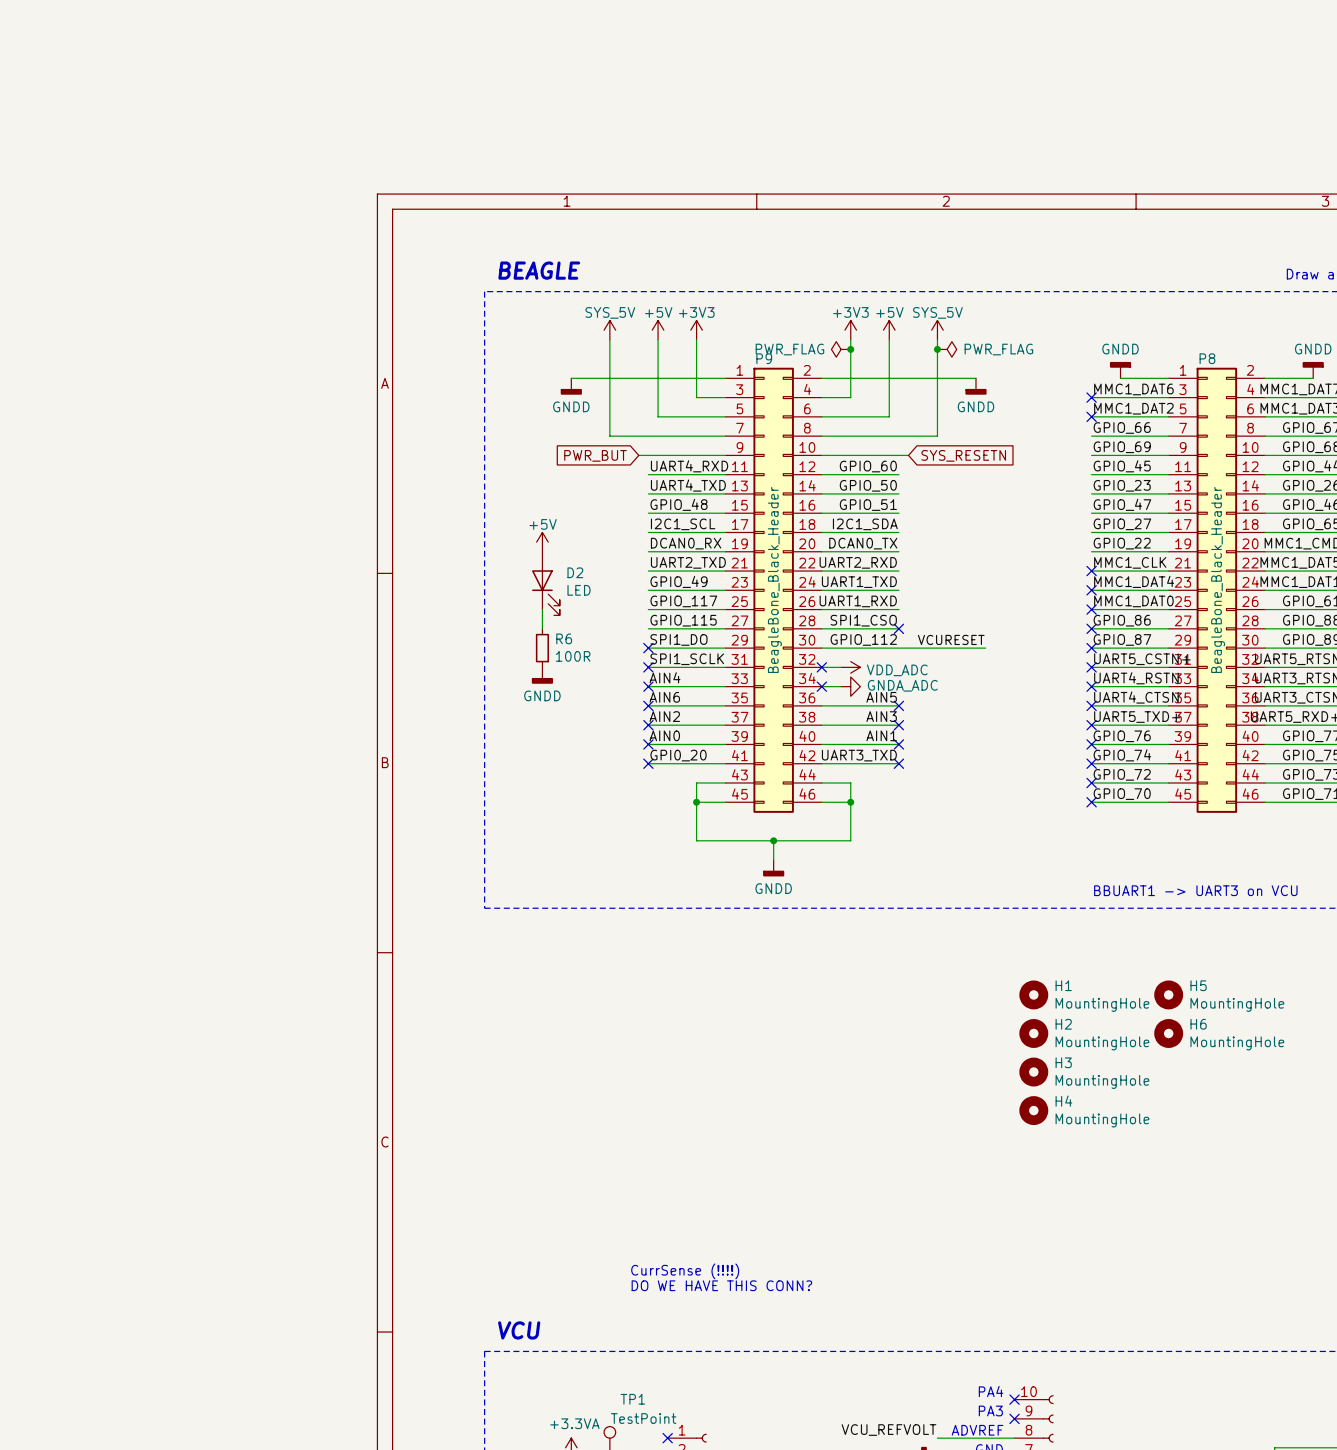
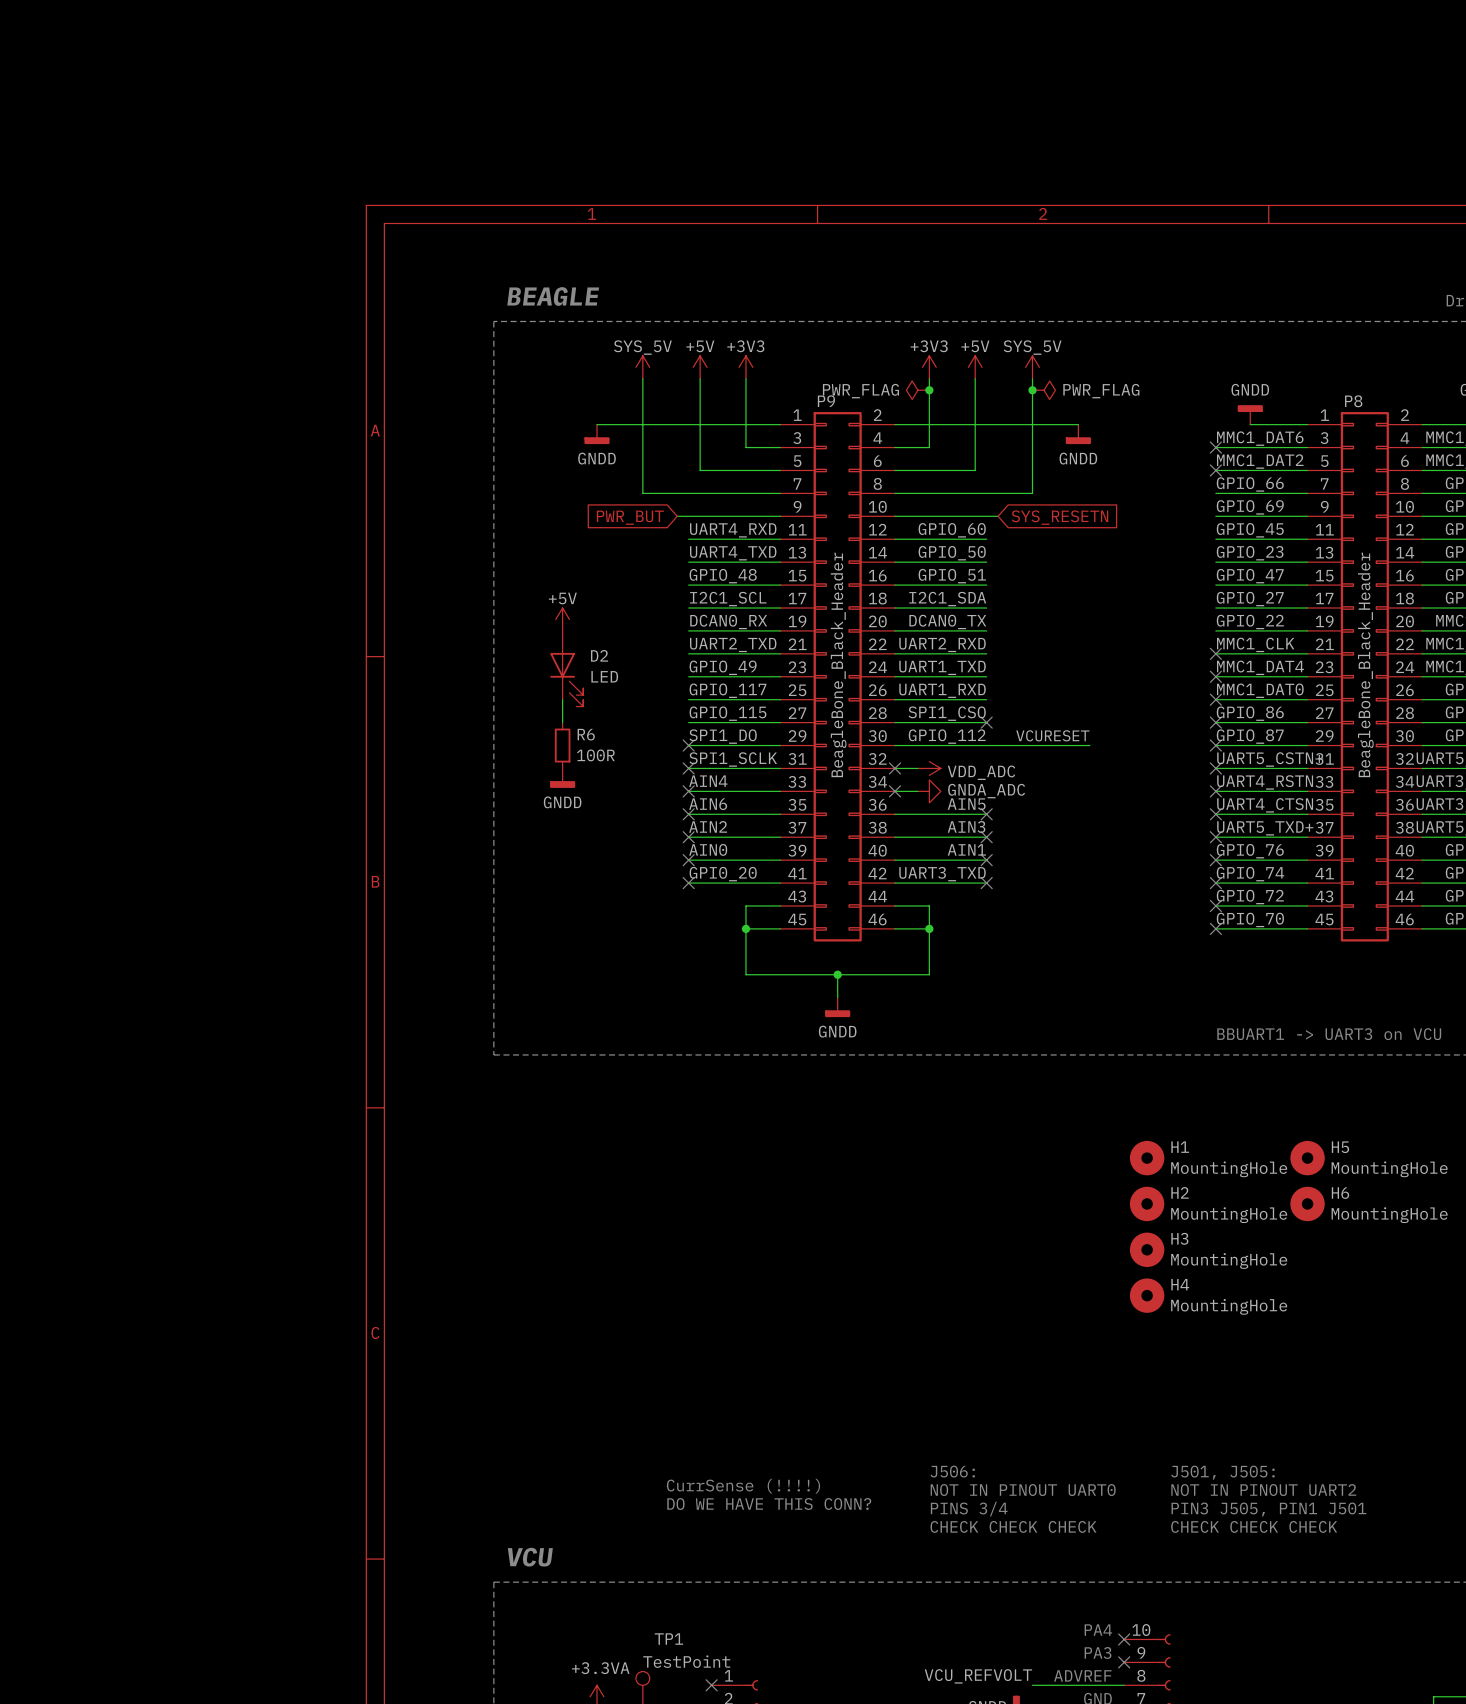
text: none -> J506: (952, 1471)
text: none -> J501, J505: (1222, 1472)
text: none -> NOT IN PINOUT UART0 (1023, 1490)
text: none -> NOT IN PINOUT UART2 (1263, 1490)
text: none -> PINS 3/4 (969, 1509)
text: none -> PIN3 J505, PIN1 J501 (1268, 1509)
text: none -> CHECK CHECK CHECK (1013, 1526)
text: none -> CHECK CHECK CHECK (1254, 1526)

